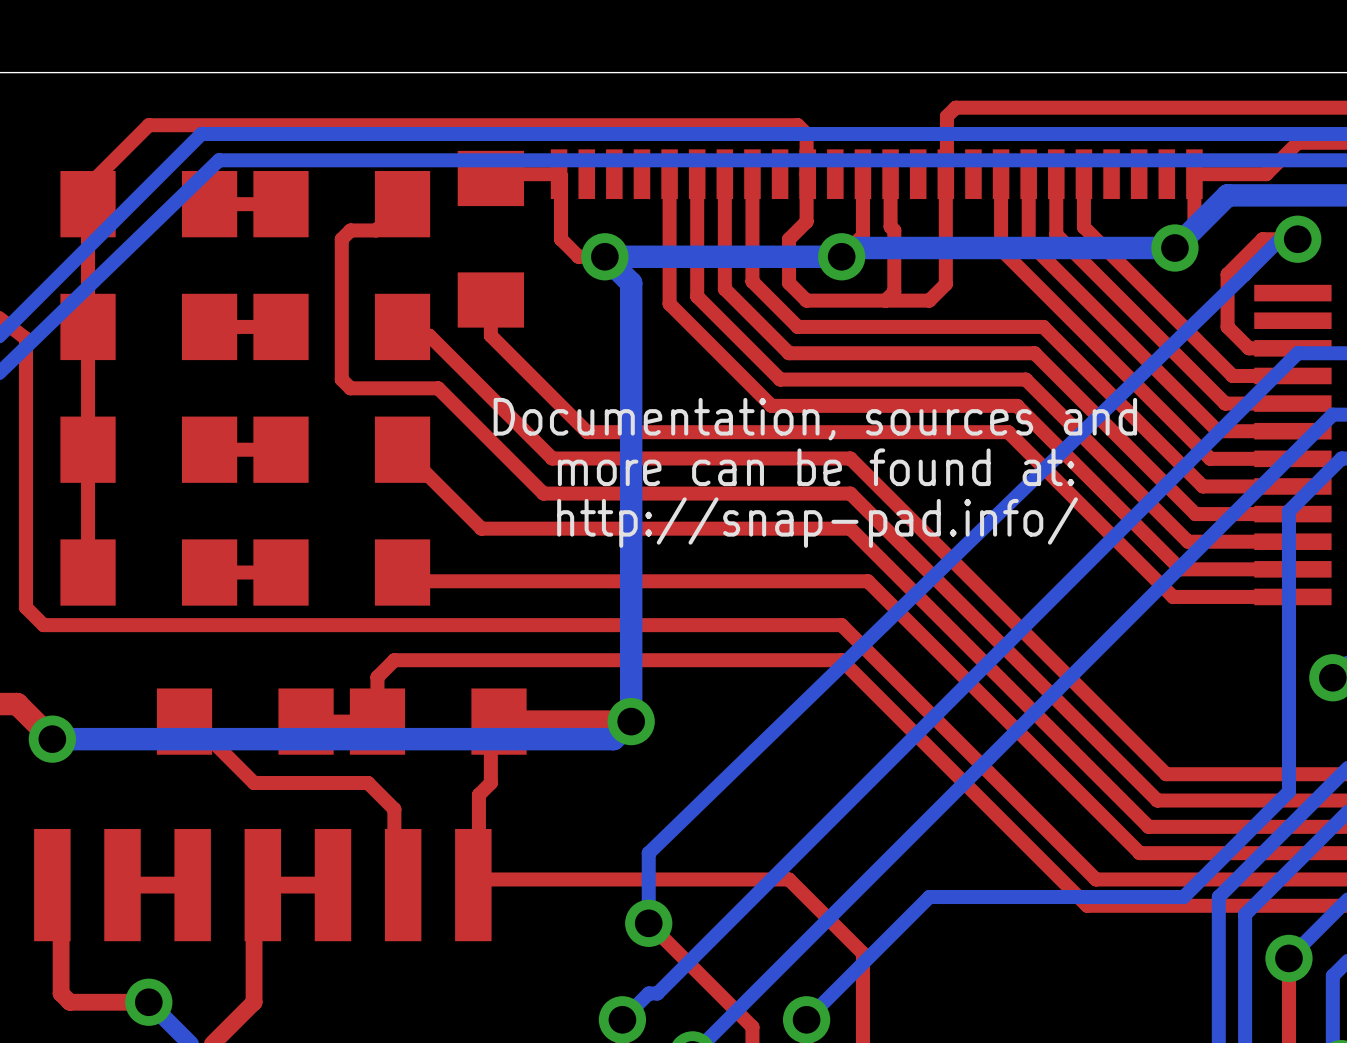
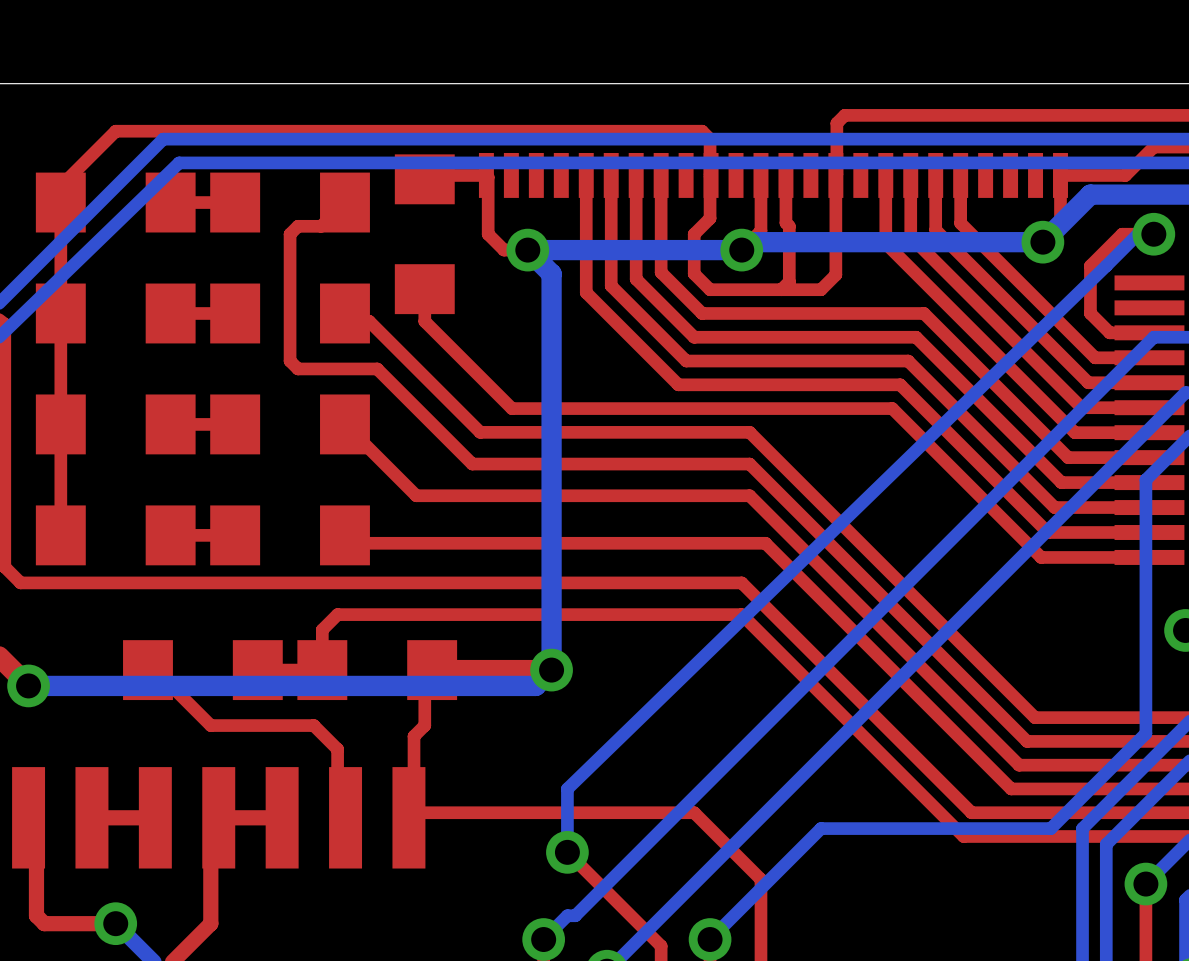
text: Documentation, sources and (815, 419) -> none
text: more can be found at: (816, 467) -> none
text: http://snap-pad.info/ (817, 522) -> none

